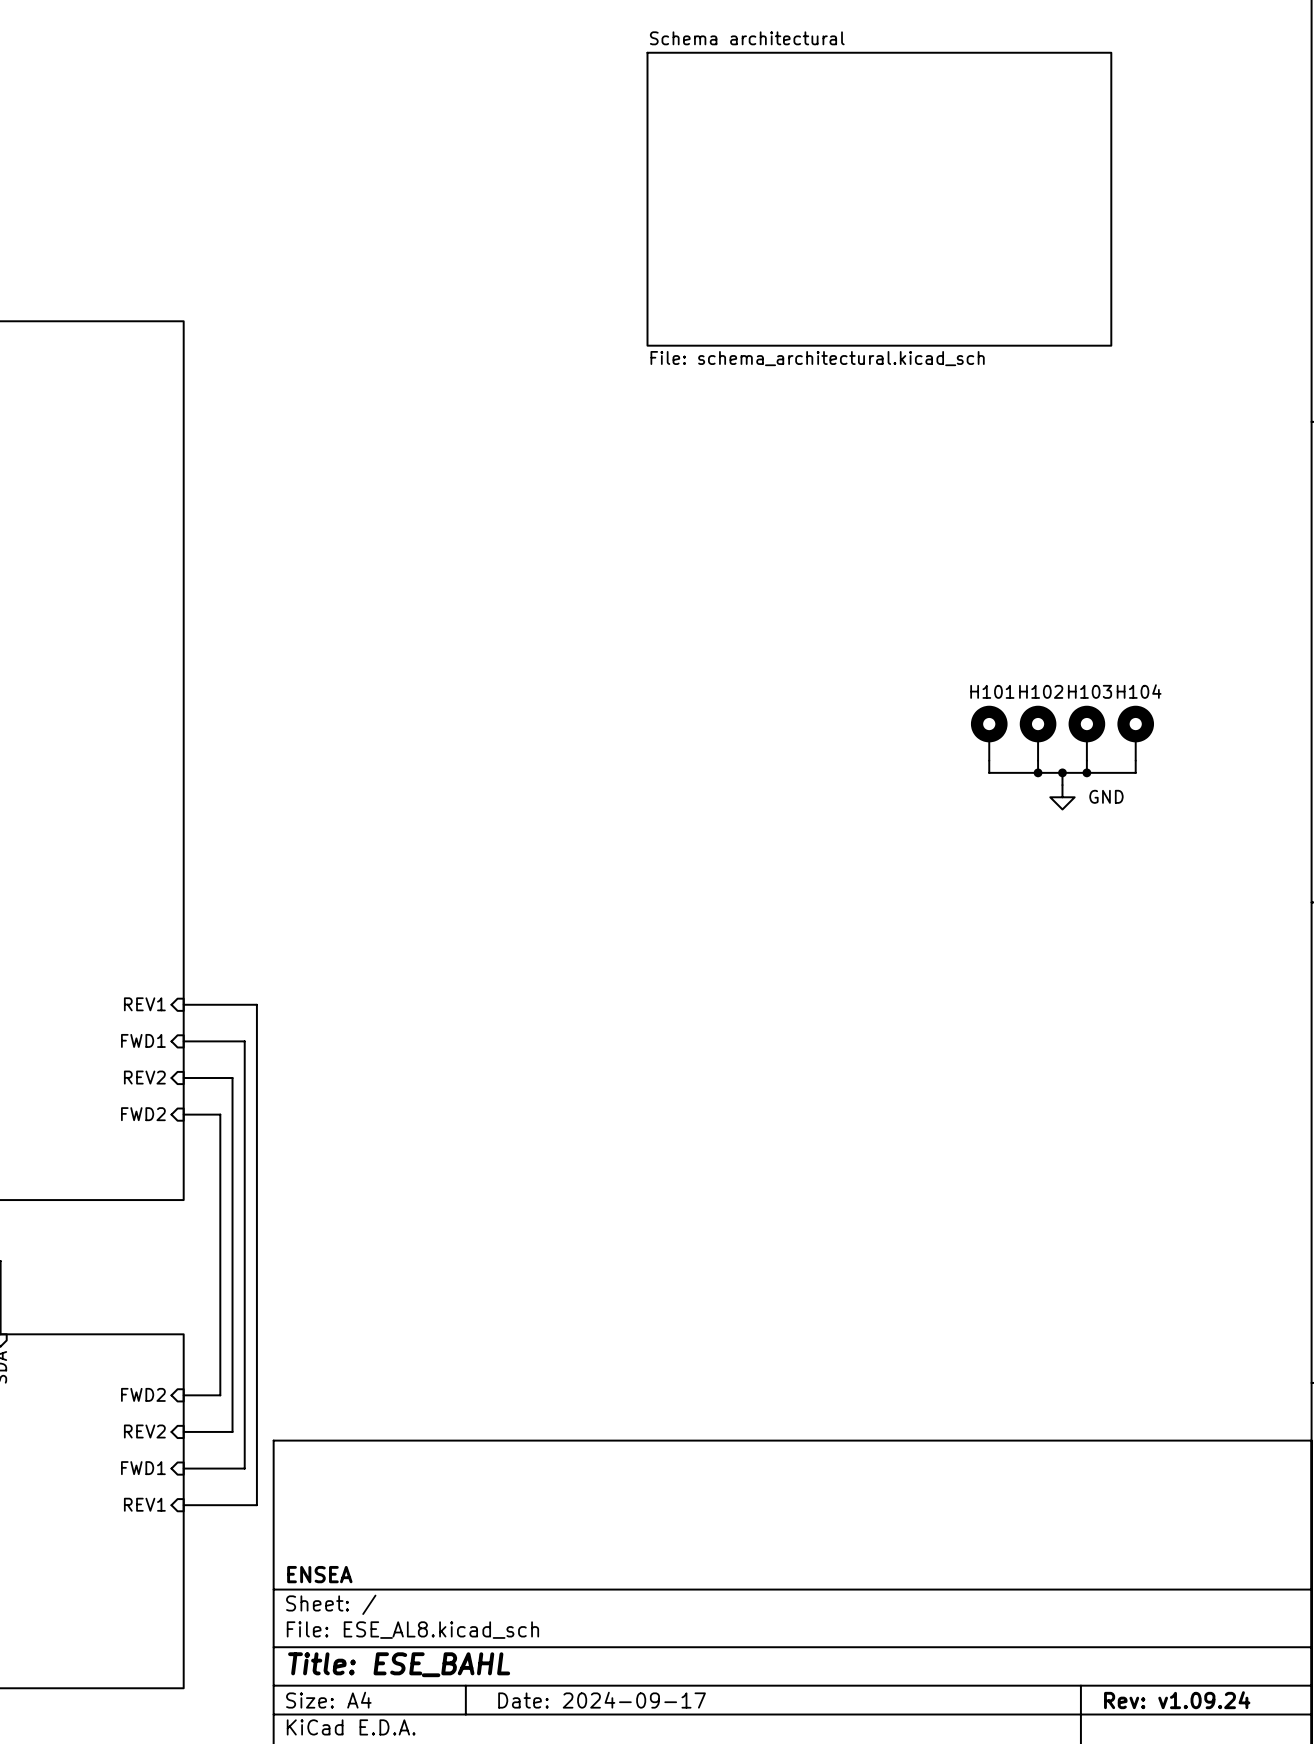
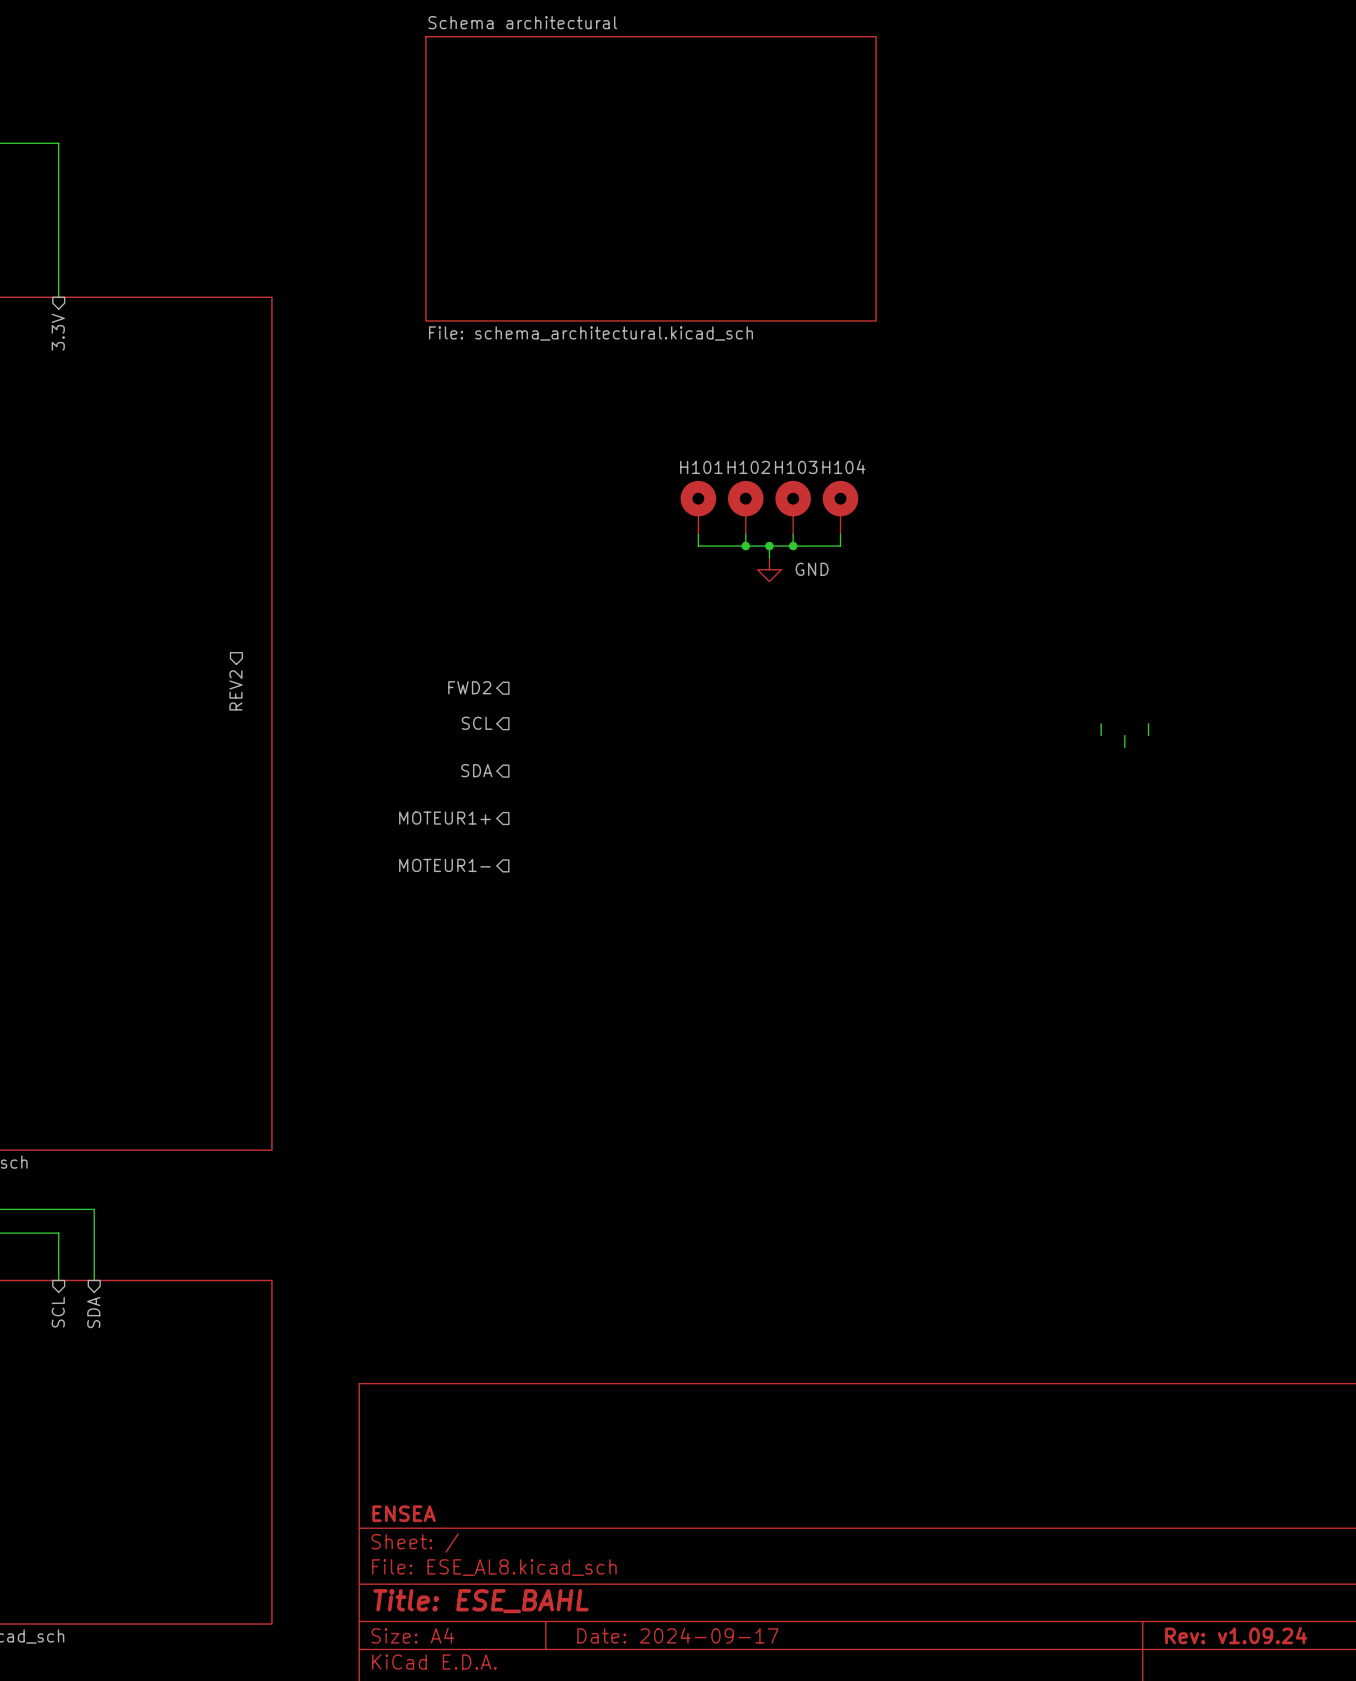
sheet Schema architectural: none -> File: schema_architectural.kicad_sch (650, 178)
sheet Schema architectural: File: schema_architectural.kicad_sch (879, 199) -> none
wire: none -> (698, 534) (698, 546) (840, 546) (840, 534)
wire: none -> (745, 534) (745, 546)
wire: none -> (793, 534) (793, 546)
junction: none -> (745, 546)
wire: none -> (769, 546) (769, 557)
junction: none -> (769, 546)
junction: none -> (793, 546)
power symbol: none -> GND (769, 569)
sheet pin: none -> FWD2 (469, 687)
sheet pin: none -> REV2 (235, 690)
H101 position: (989, 733) -> (698, 507)
H102 position: (1038, 733) -> (745, 507)
H103 position: (1086, 733) -> (793, 507)
H104 position: (1135, 733) -> (840, 507)
sheet pin: none -> SCL (477, 723)
wire: (989, 760) (989, 772) (1135, 772) (1135, 760) -> none
junction: (1038, 772) -> none
junction: (1062, 772) -> none
junction: (1086, 772) -> none
power symbol: GND (1062, 797) -> none
sheet pin: none -> SDA (476, 770)
sheet pin: none -> MOTEUR1+ (444, 818)
sheet pin: none -> MOTEUR1- (444, 865)
sheet pin: REV1 (144, 1004) -> none
wire: (183, 1004) (256, 1004) (256, 1505) (183, 1505) -> none
sheet pin: FWD1 (143, 1040) -> none
wire: (183, 1041) (244, 1041) (244, 1468) (183, 1468) -> none
sheet pin: REV2 (144, 1077) -> none
wire: (183, 1078) (232, 1078) (232, 1431) (183, 1431) -> none
sheet pin: FWD2 (143, 1114) -> none
wire: (183, 1114) (220, 1114) (220, 1395) (183, 1395) -> none
sheet pin: FWD2 (143, 1394) -> none
sheet pin: REV2 (144, 1431) -> none
sheet pin: FWD1 (143, 1468) -> none
sheet pin: REV1 (144, 1504) -> none

